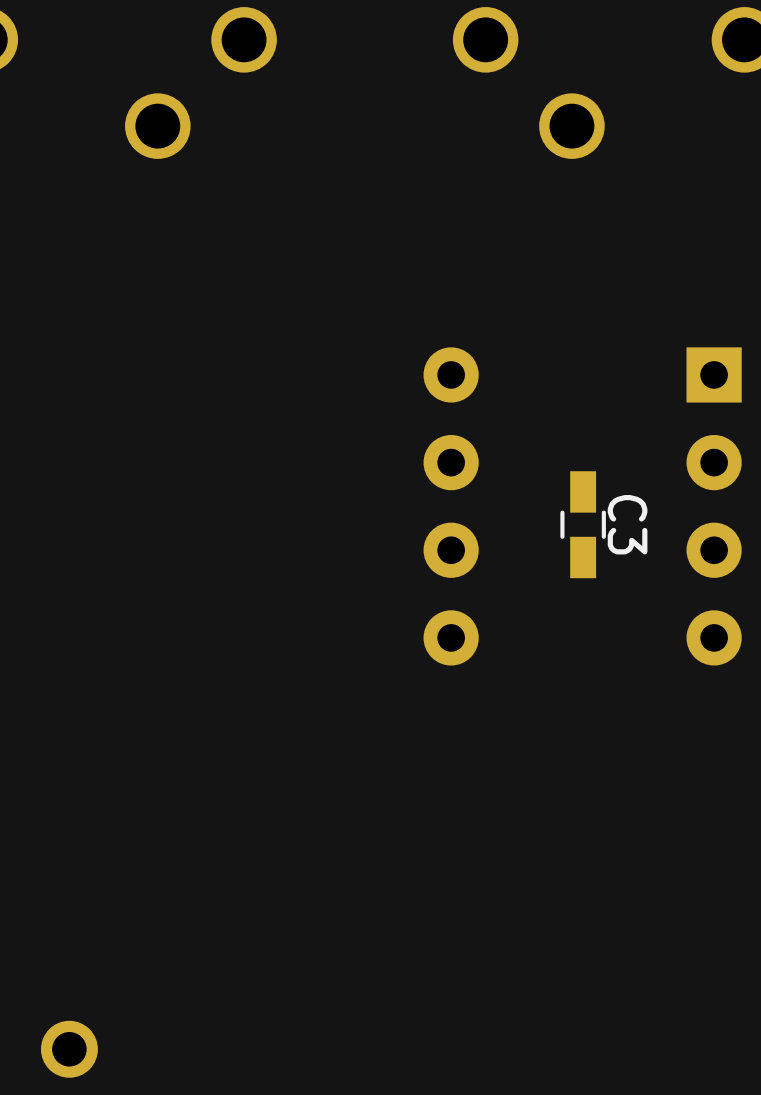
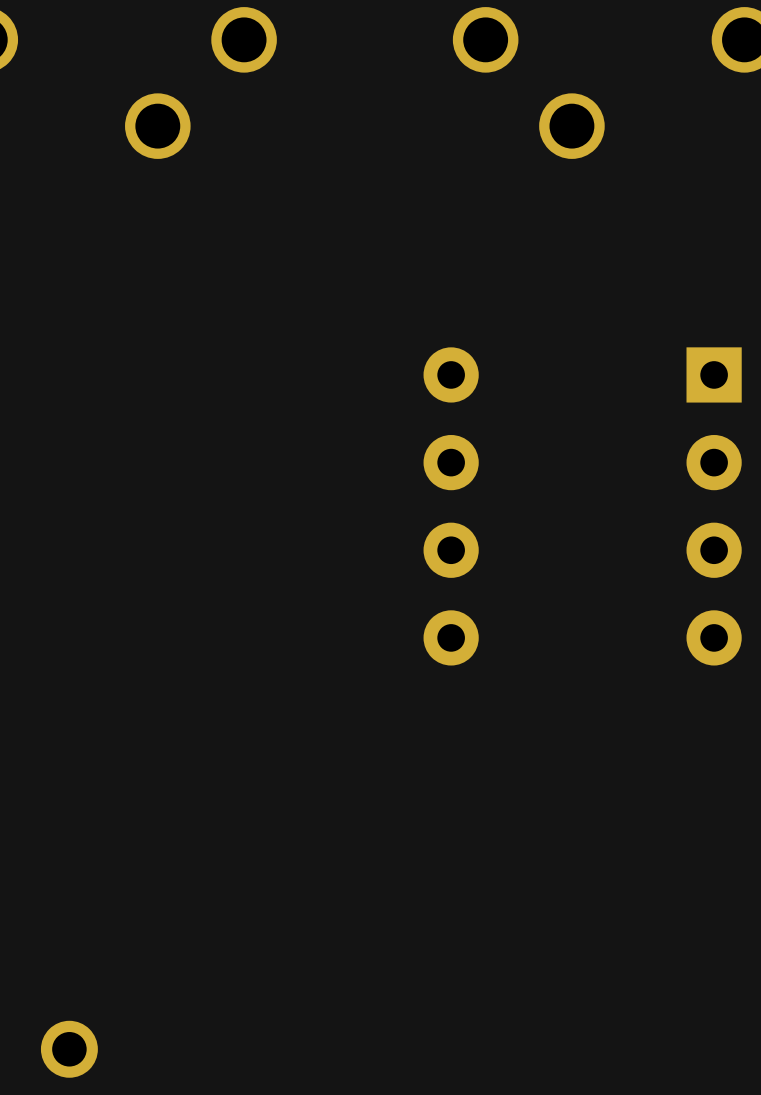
C3: (583, 524) -> none

